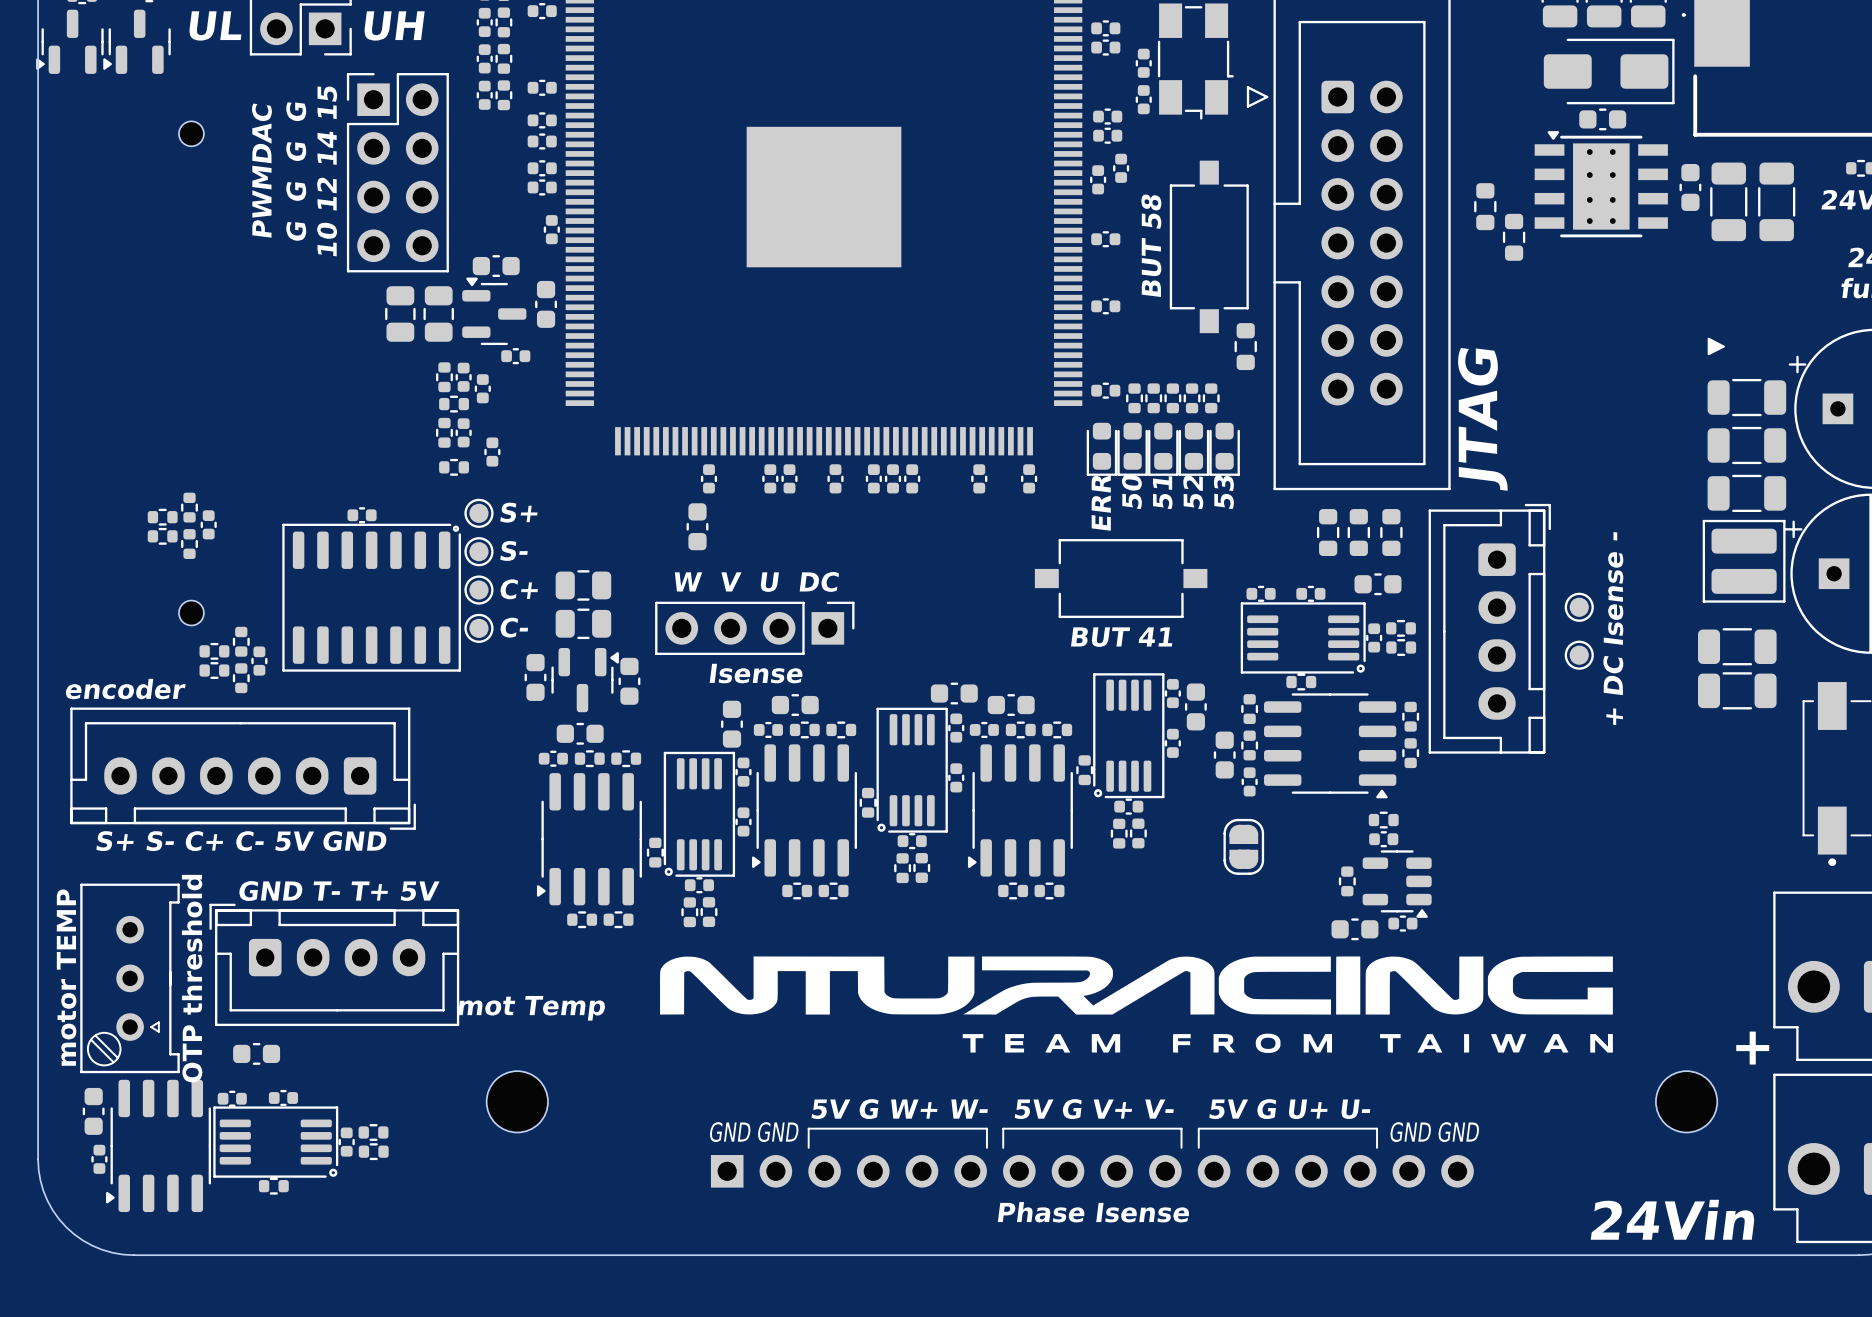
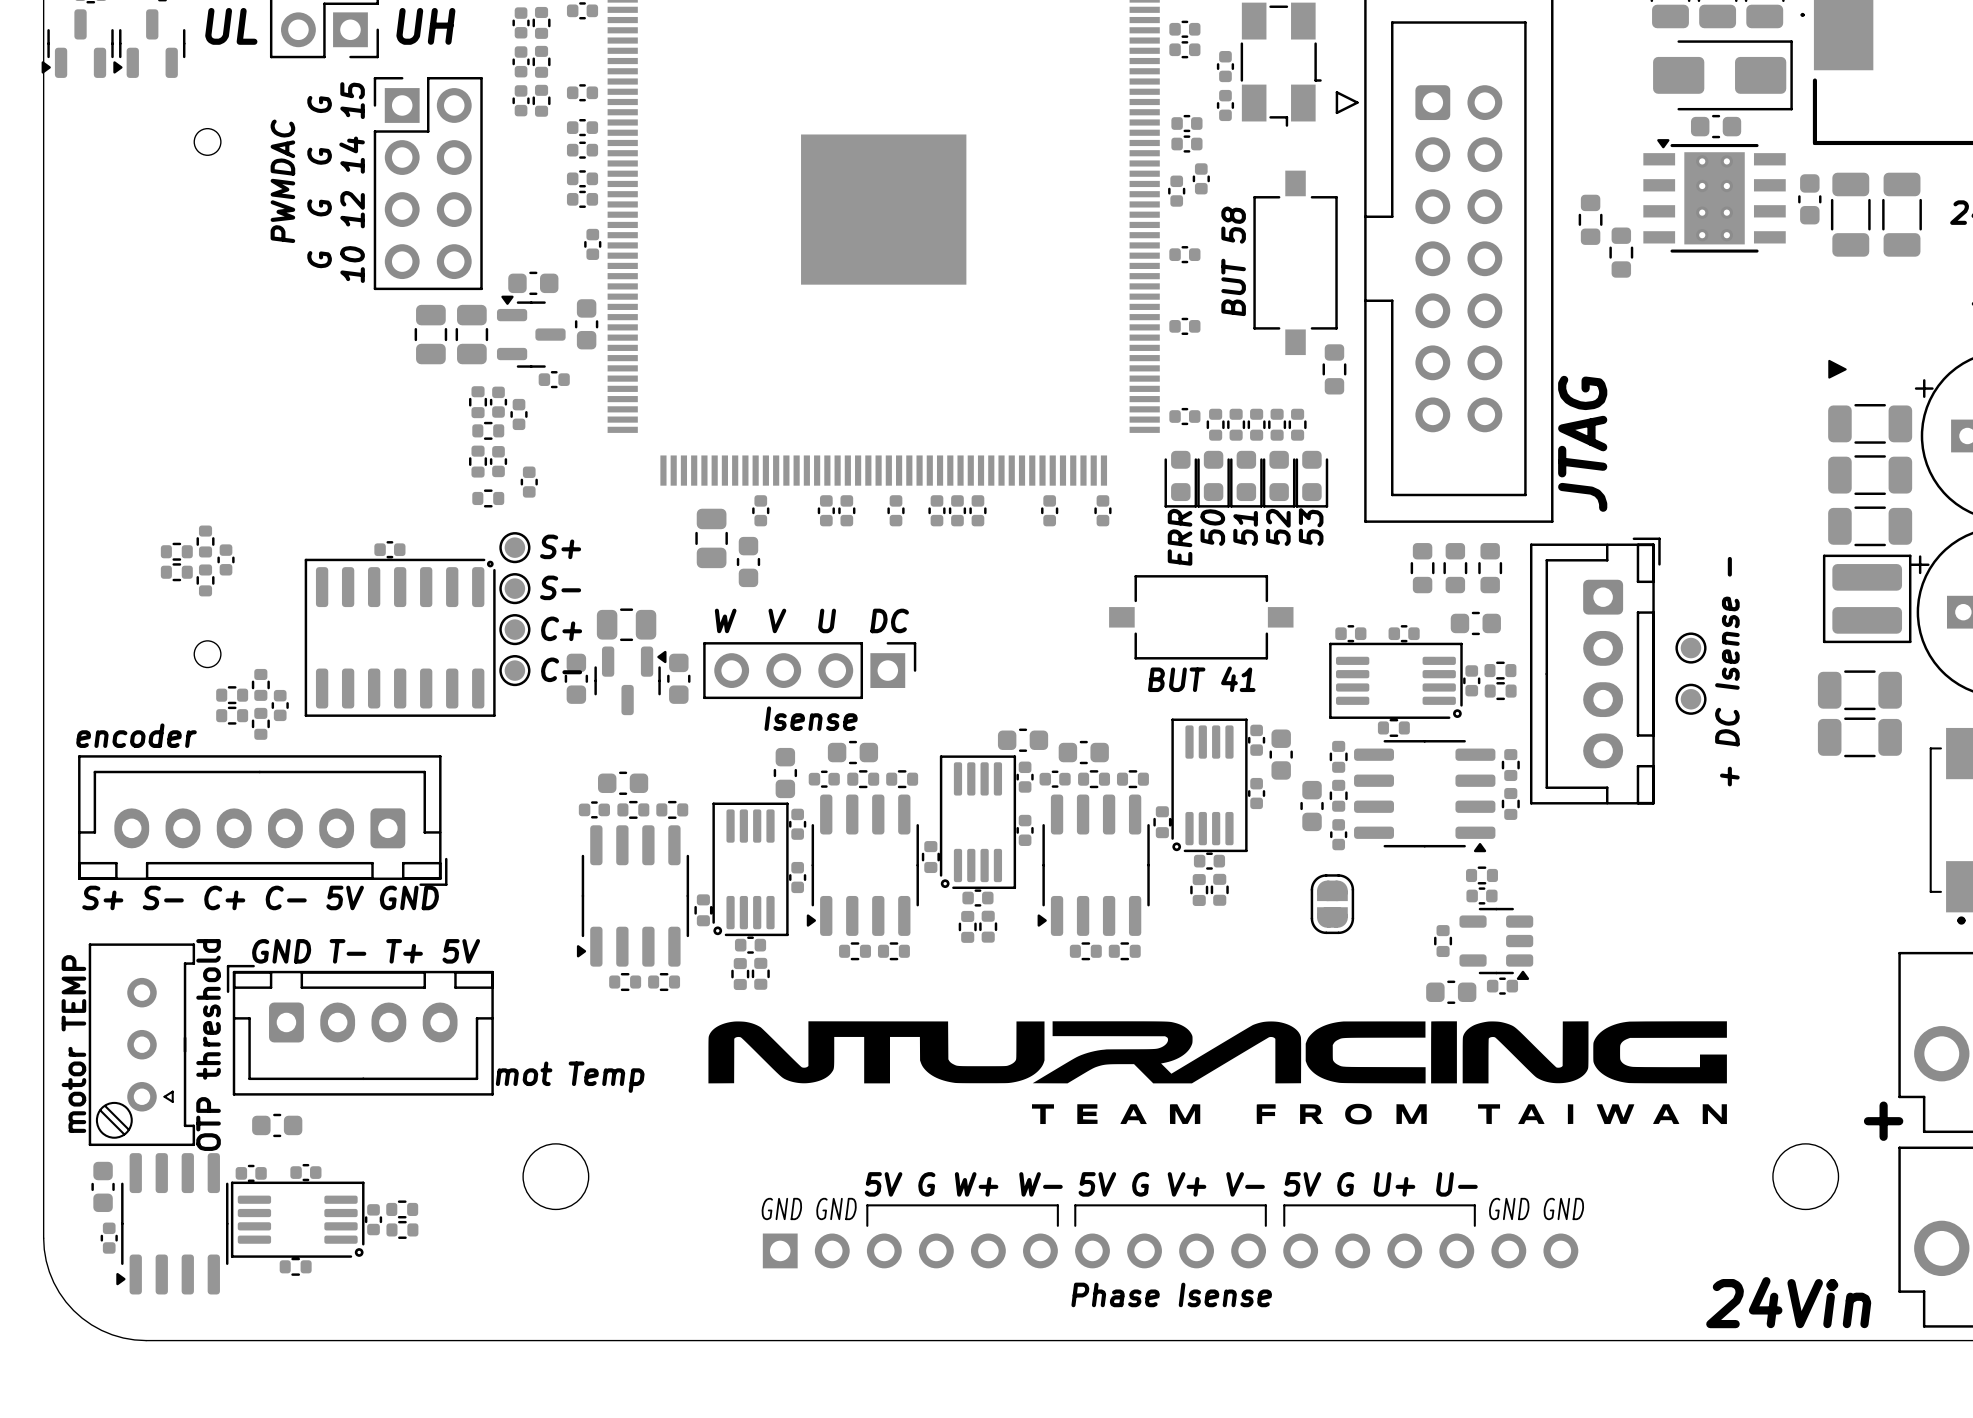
part: none -> (711, 538)
part footprint: [555, 608, 612, 640] -> [594, 646, 667, 716]
part position: (535, 677) -> (576, 678)
part: (585, 680) -> none
part position: (629, 681) -> (678, 678)

